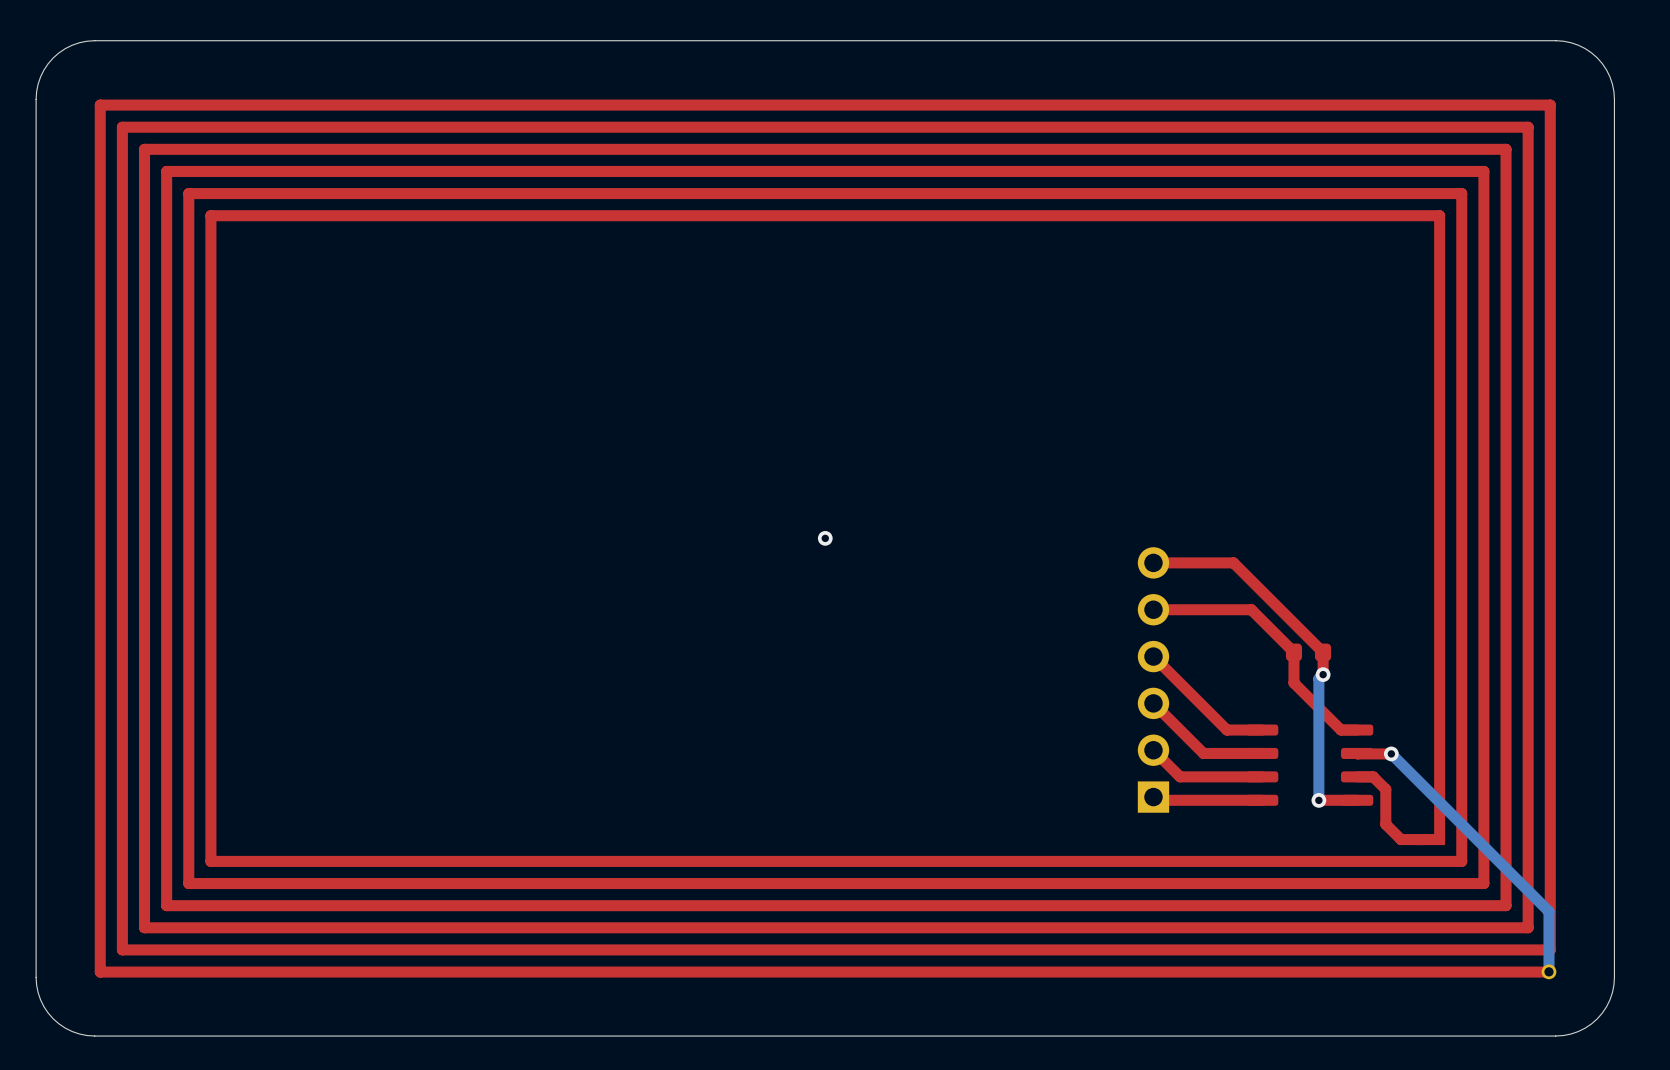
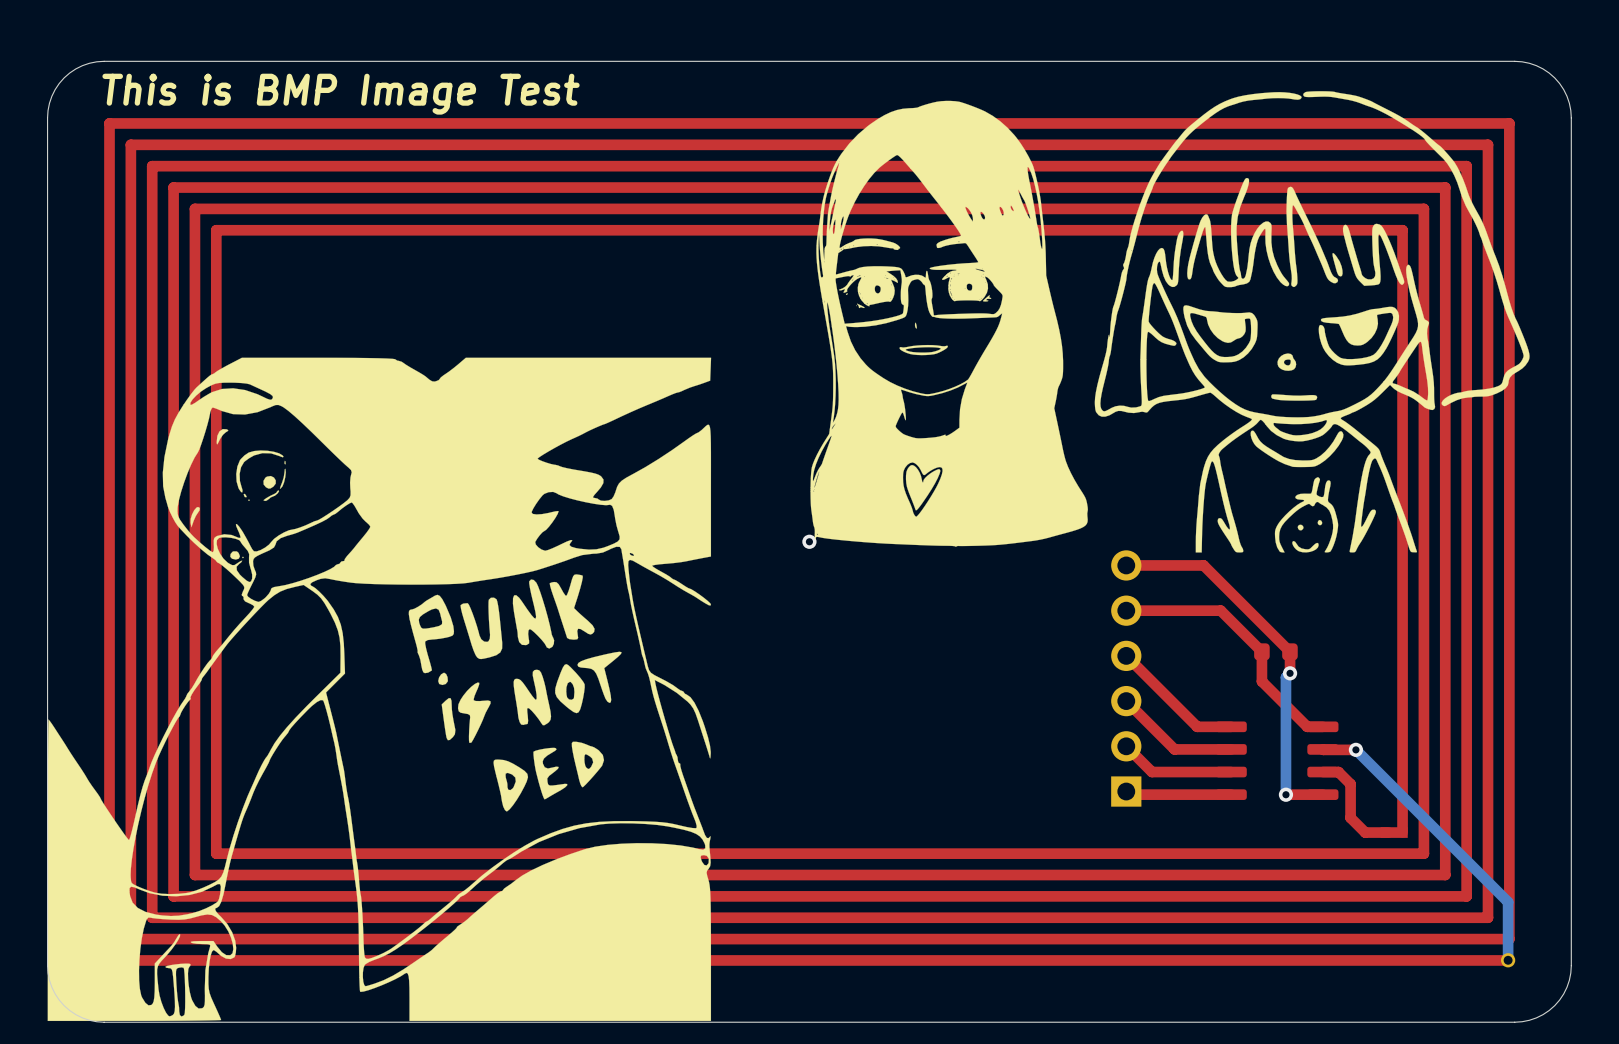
drawing: none -> [810, 91, 1530, 553]
text: none -> This is BMP Image Test (341, 94)
drawing: none -> [47, 357, 712, 1022]

